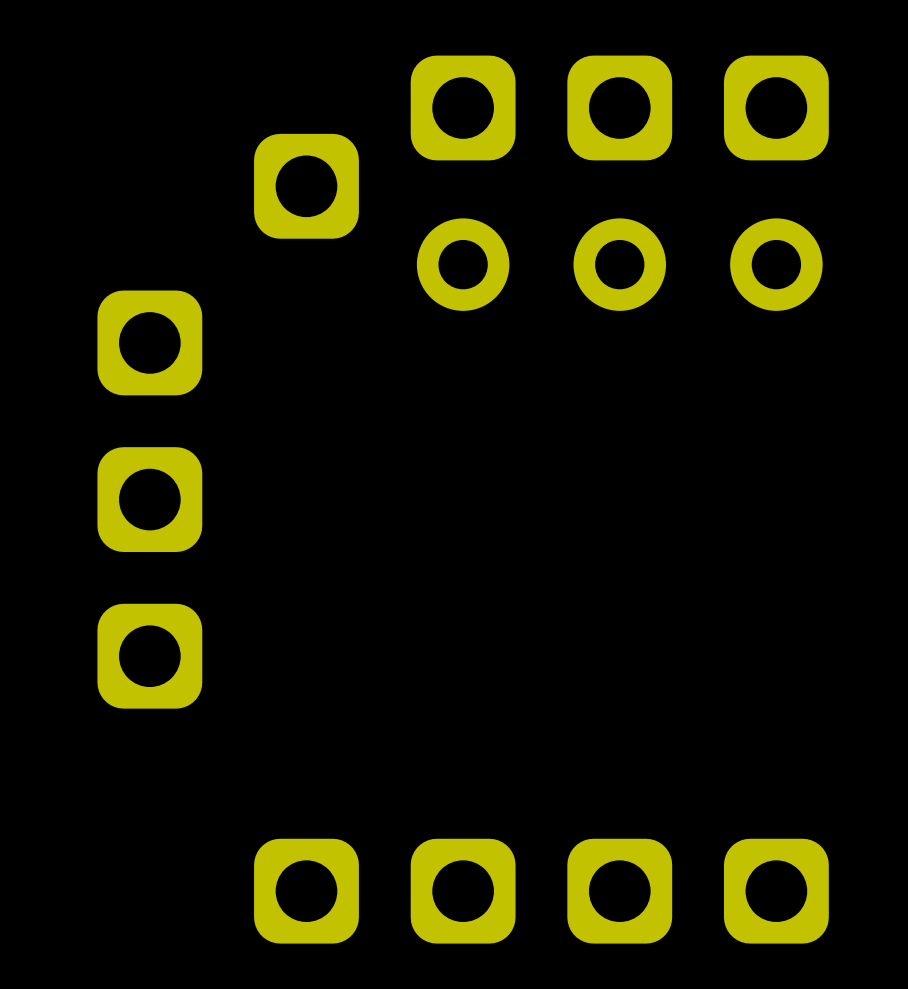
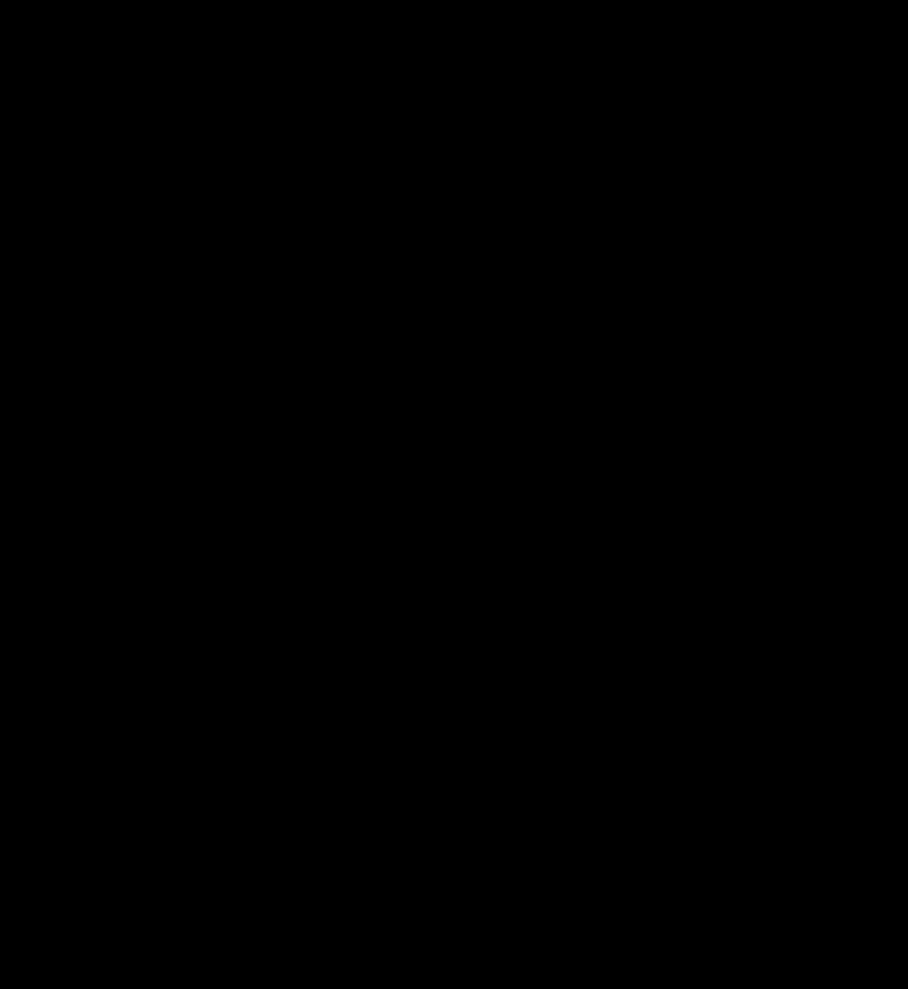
part: (463, 107) -> none
part: (619, 107) -> none
part: (776, 107) -> none
part: (306, 186) -> none
part: (463, 264) -> none
part: (619, 264) -> none
part: (776, 264) -> none
part: (149, 342) -> none
part: (149, 499) -> none
part: (149, 656) -> none
part: (306, 891) -> none
part: (463, 891) -> none
part: (619, 891) -> none
part: (776, 891) -> none

